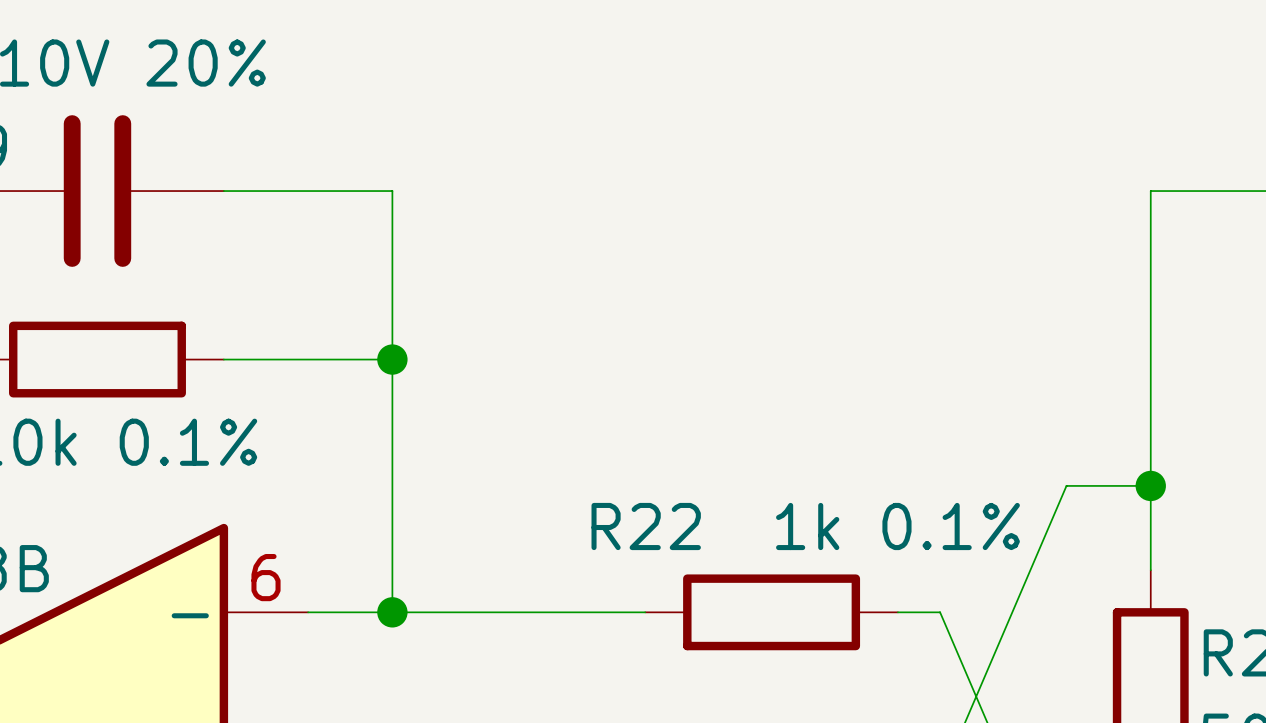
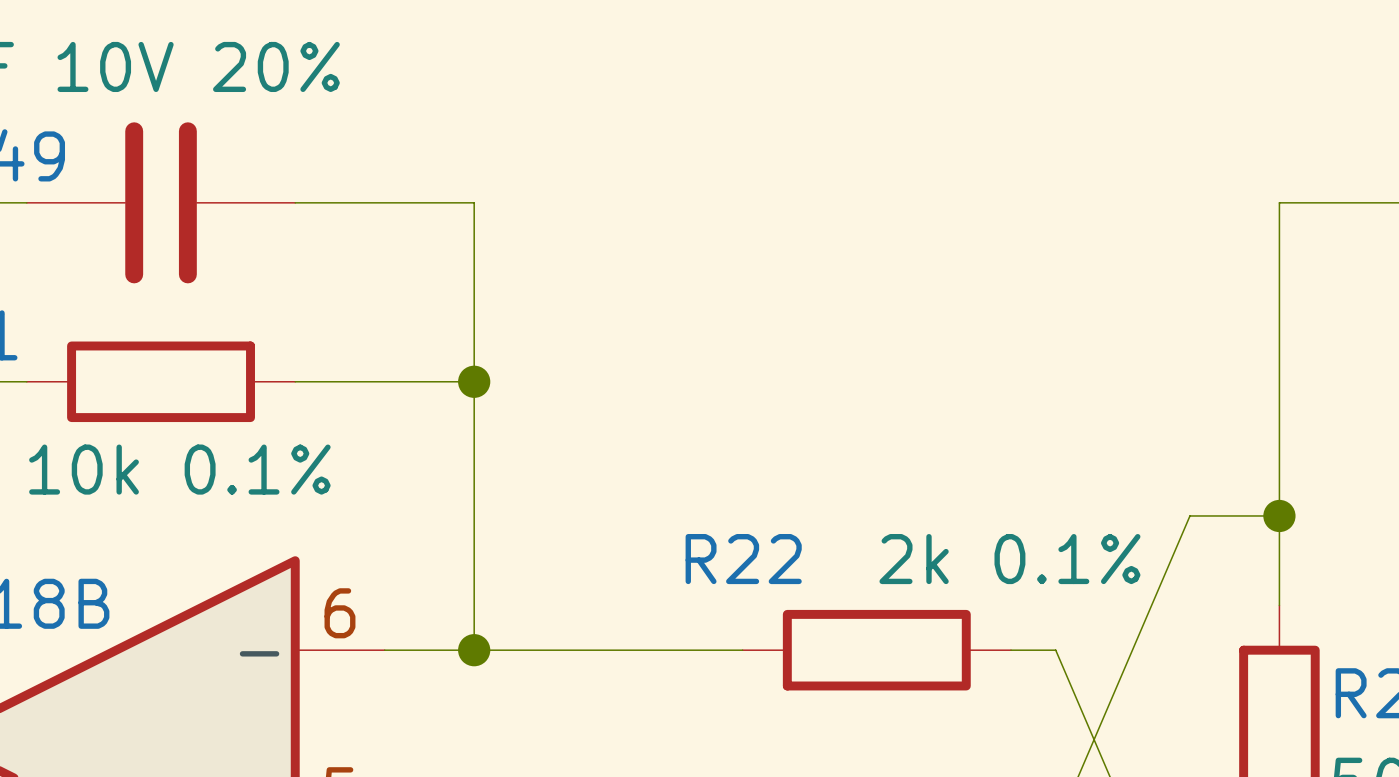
R22 value: 1k 0.1% (897, 526) -> 2k 0.1% (1009, 559)

